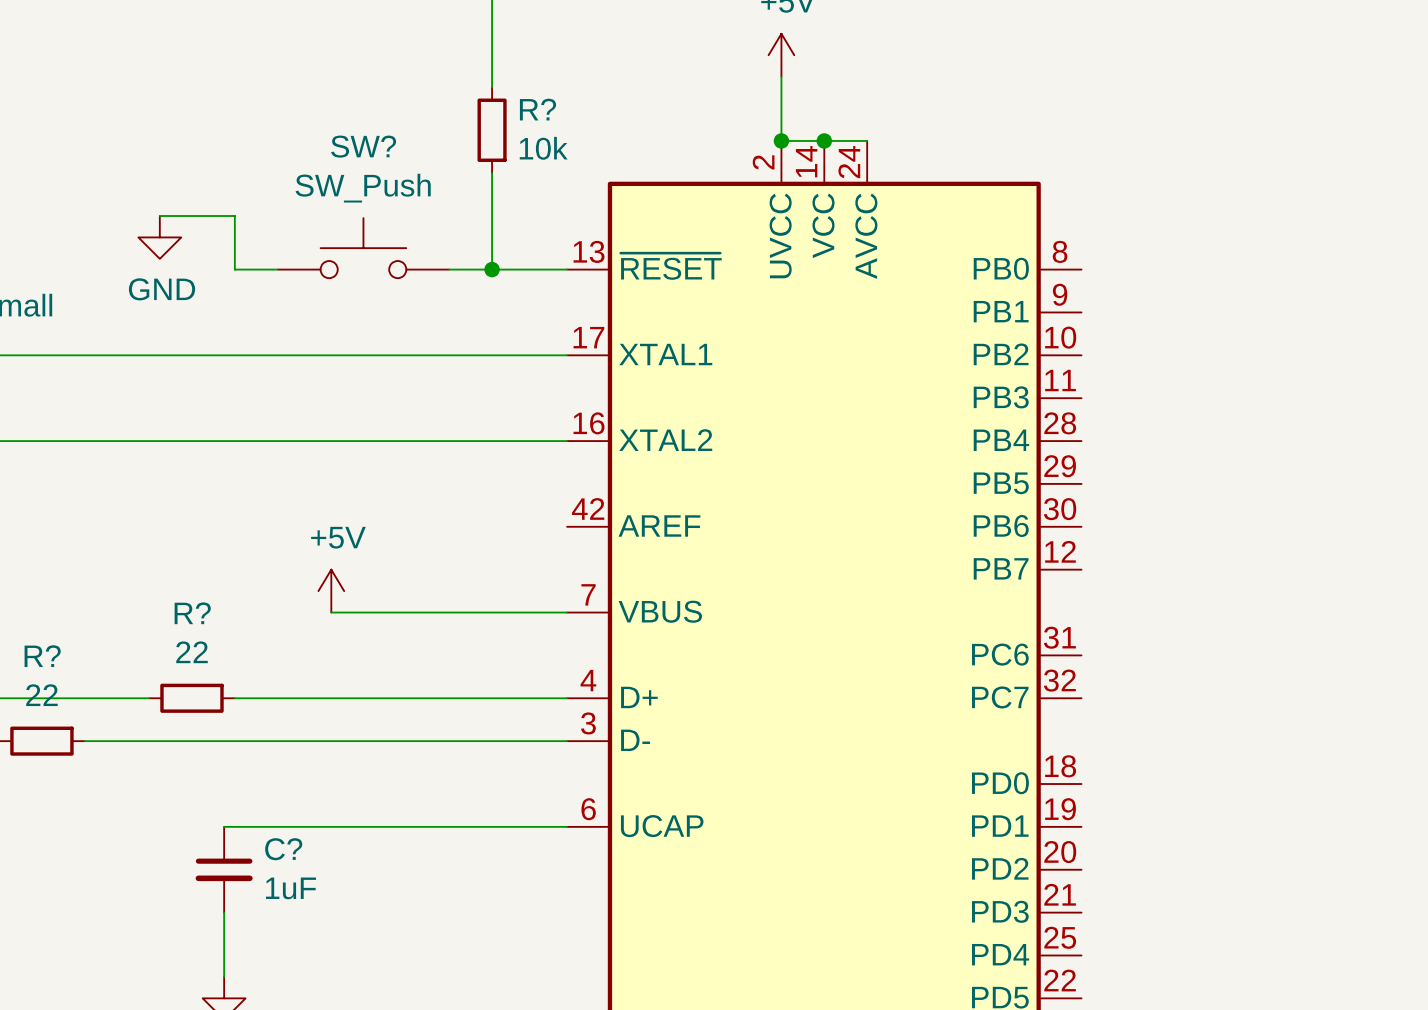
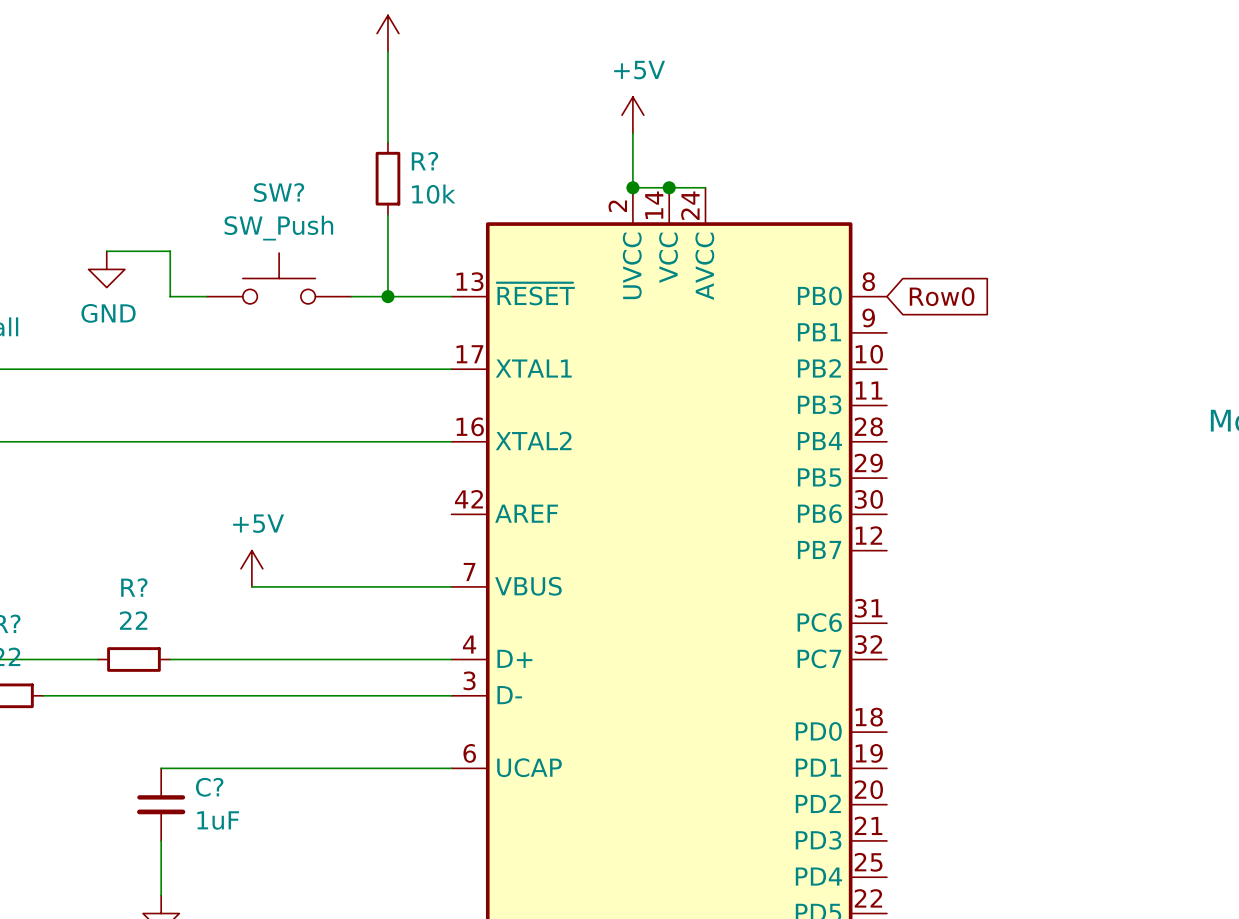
global label: none -> Row0 (942, 296)

